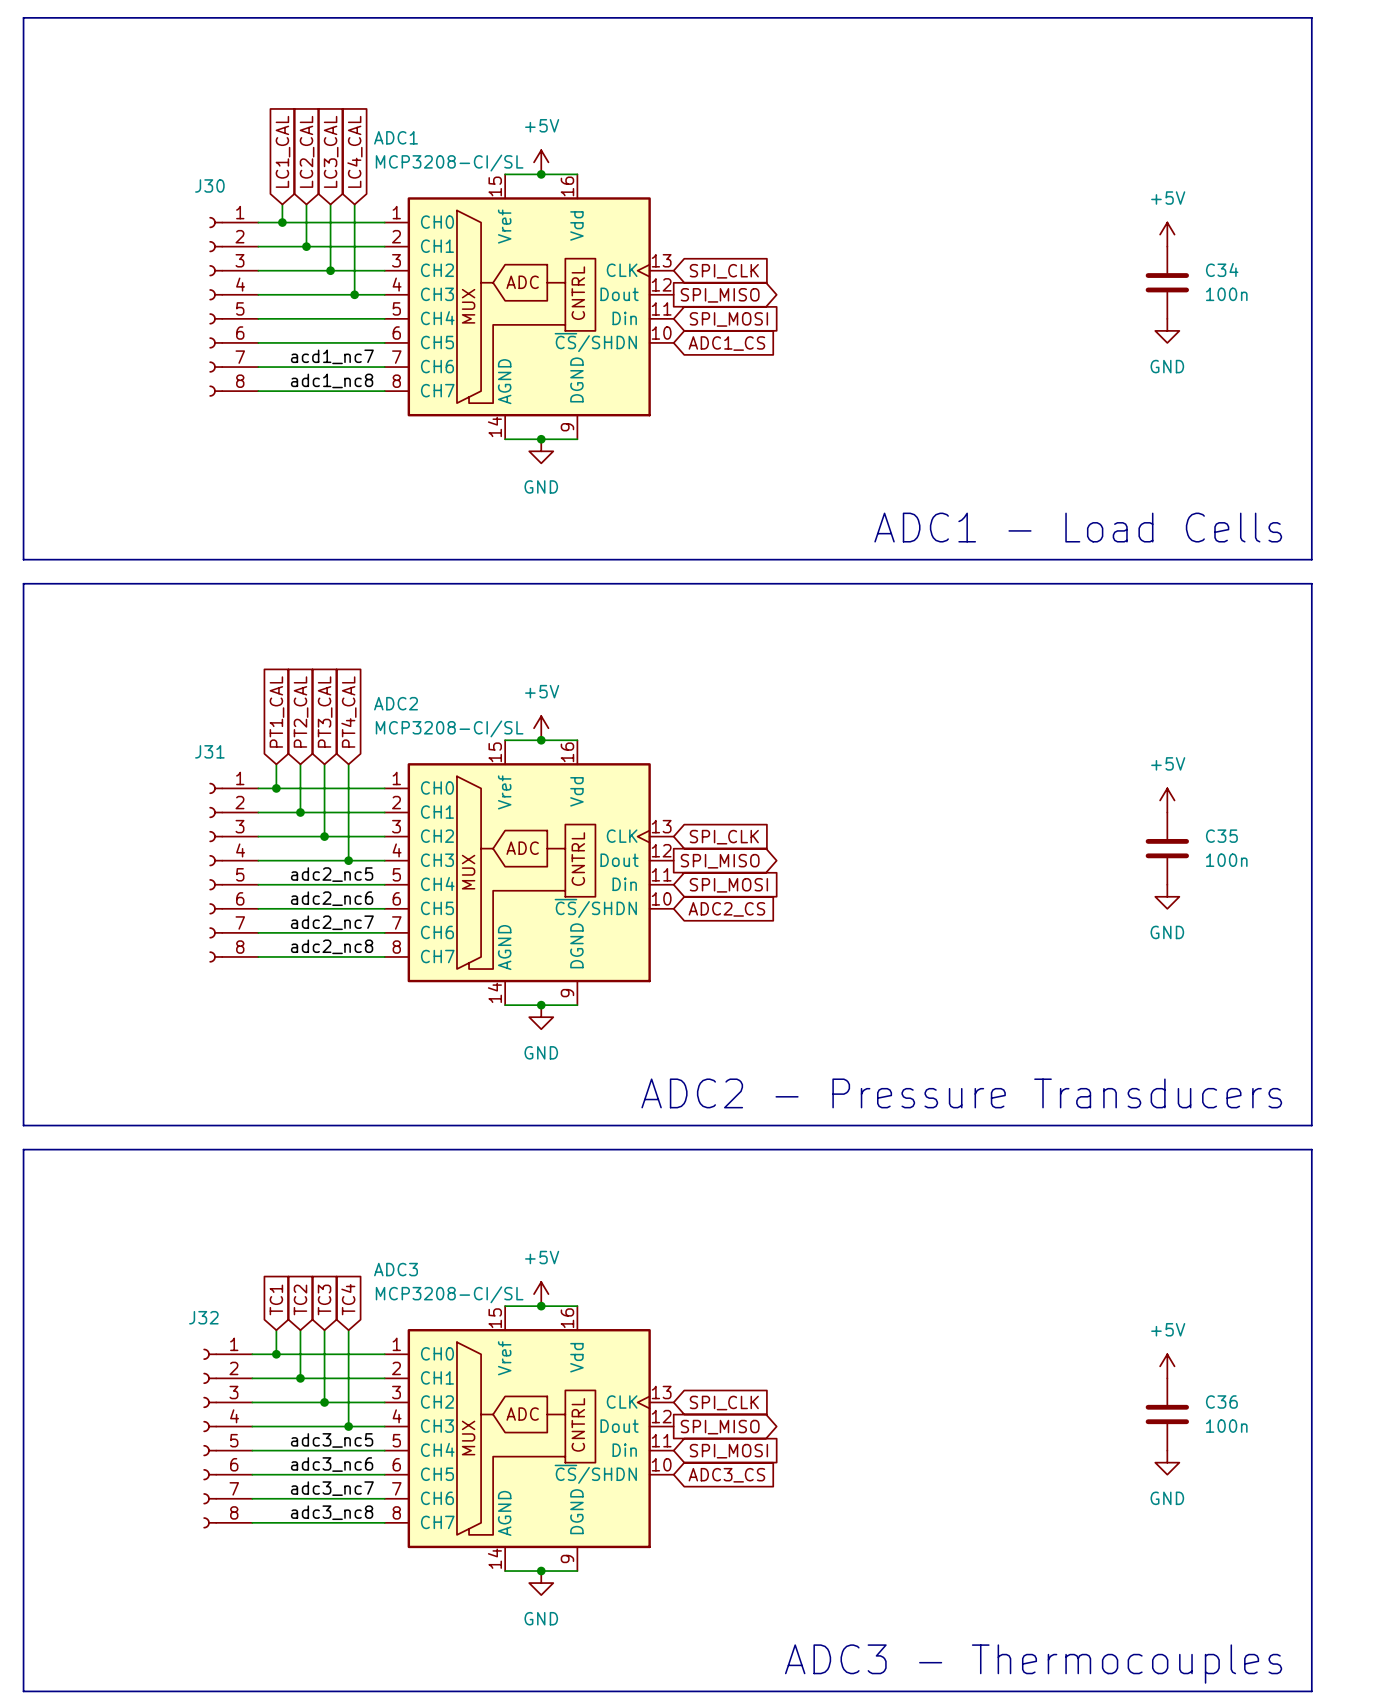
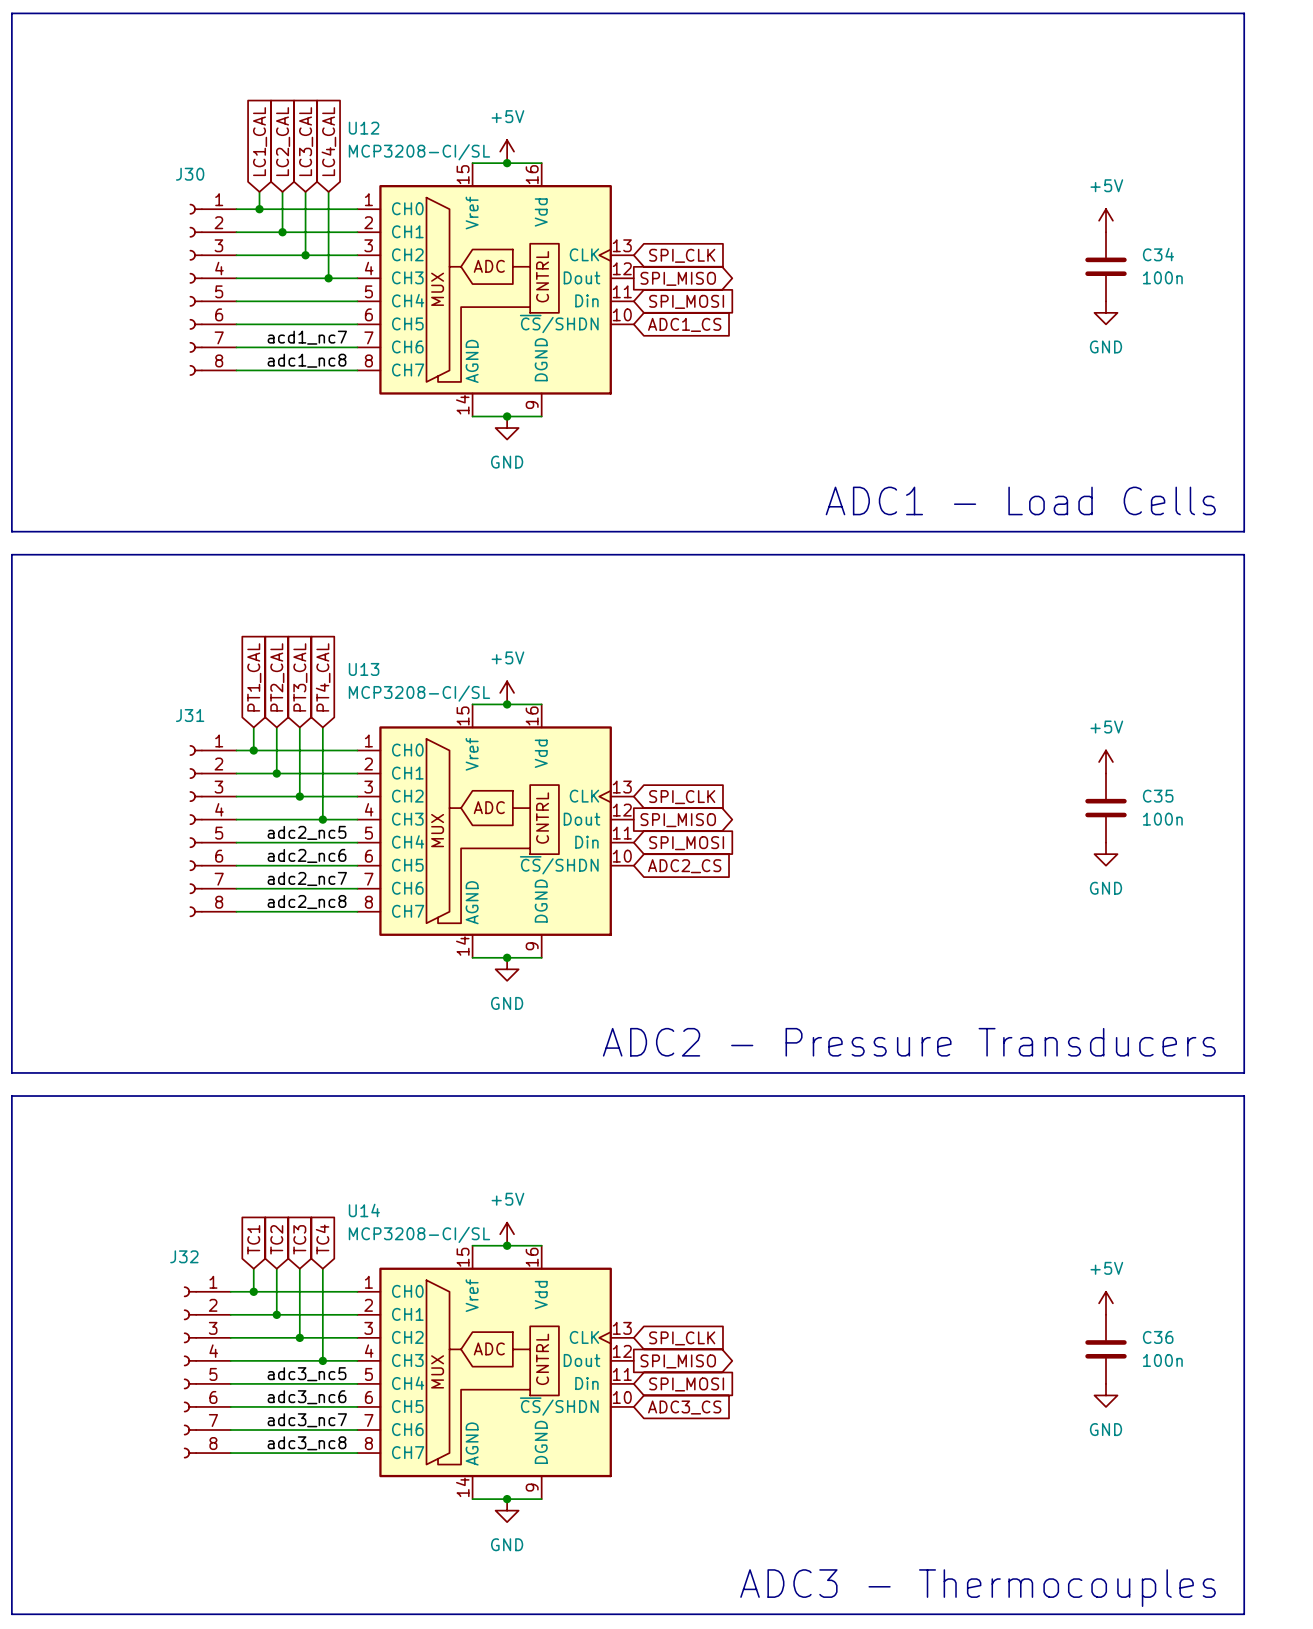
ADC1 name: ADC1 (396, 137) -> U12 (364, 128)
ADC2 name: ADC2 (396, 703) -> U13 (364, 669)
ADC3 name: ADC3 (396, 1269) -> U14 (364, 1210)

